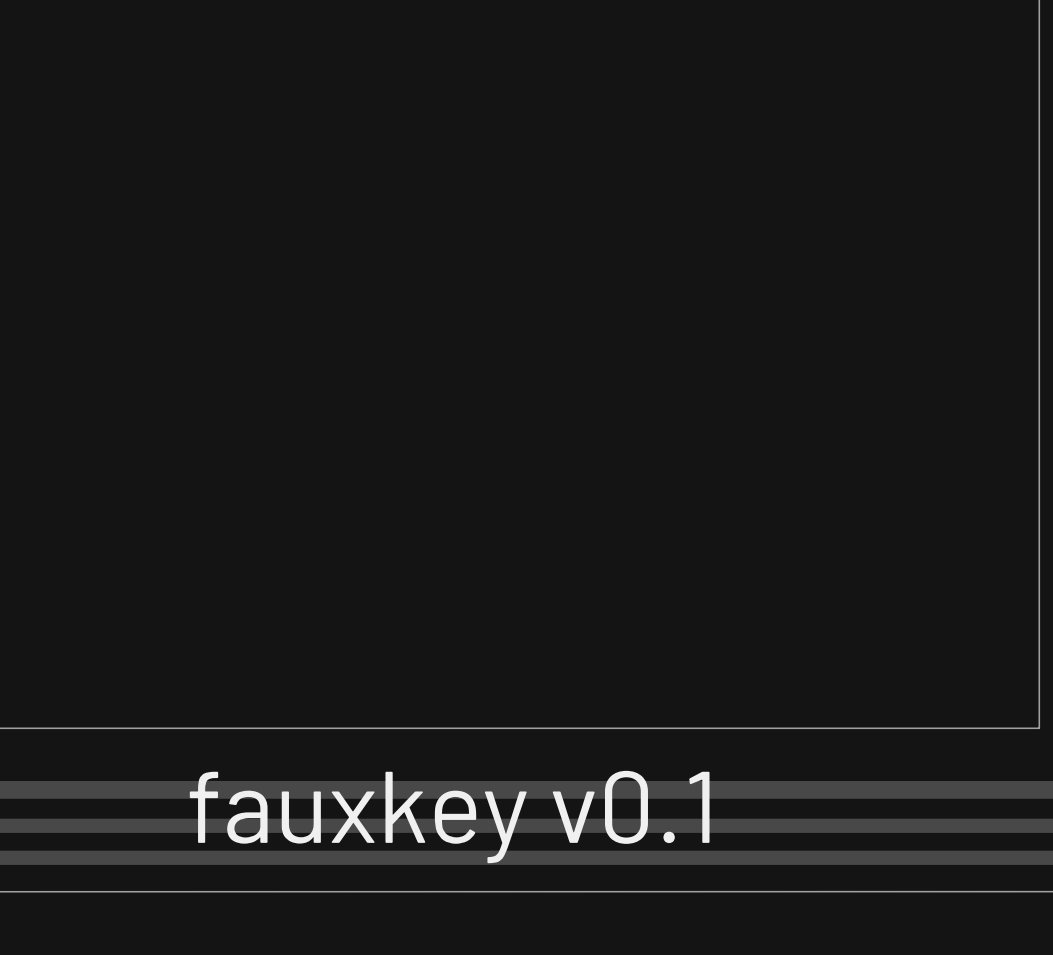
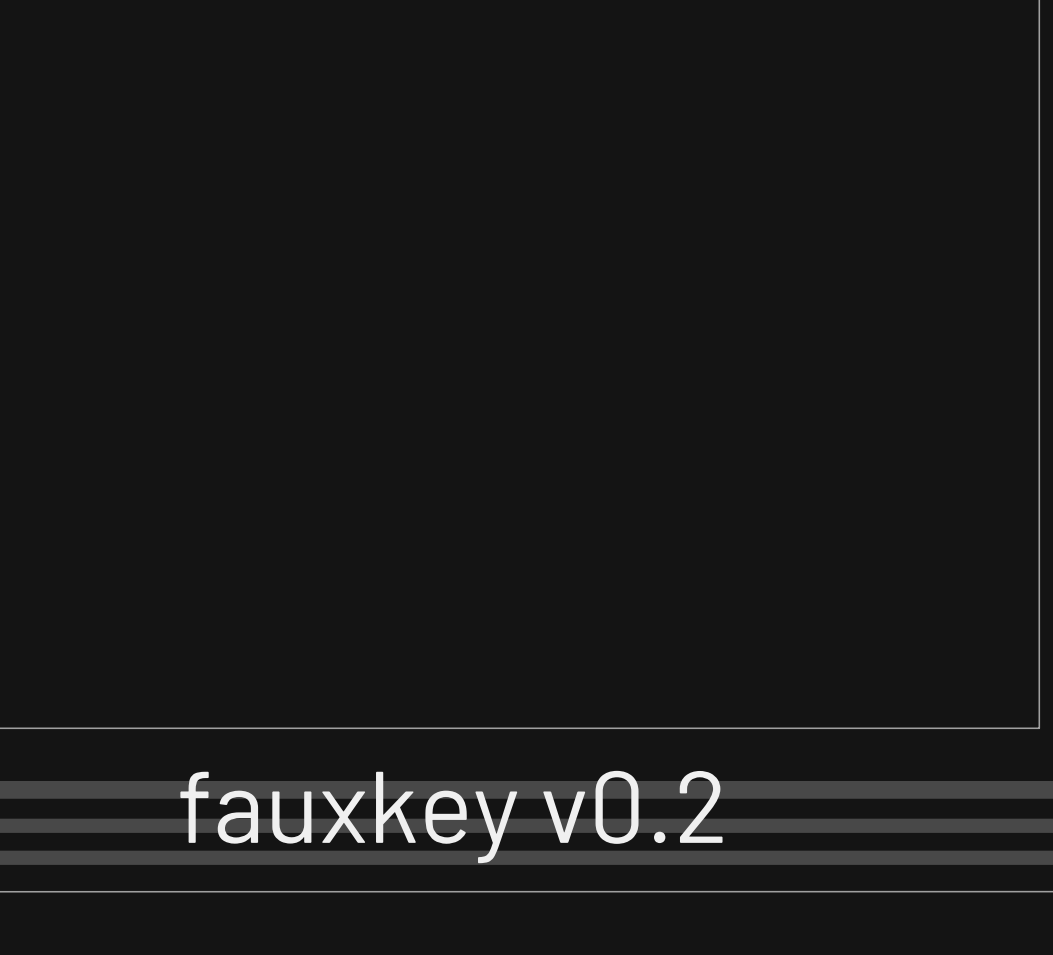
text: fauxkey v0.1 (449, 817) -> fauxkey v0.2 (451, 817)

